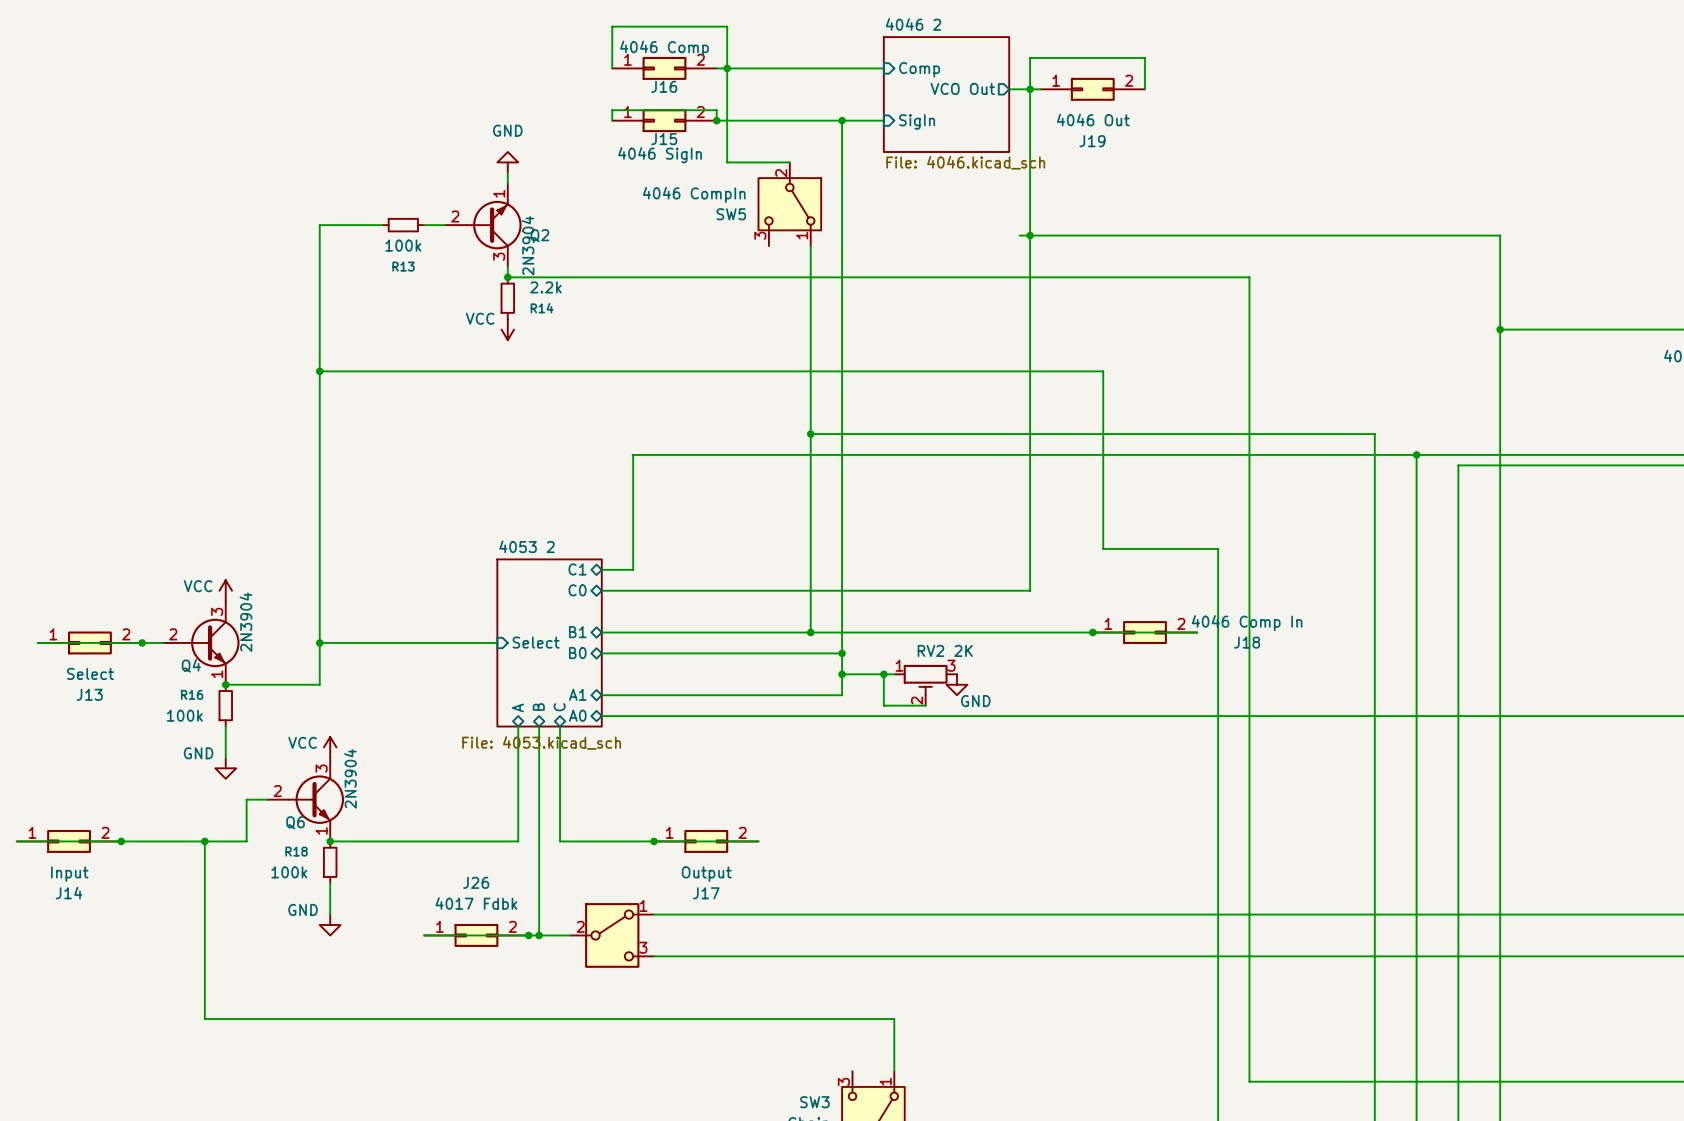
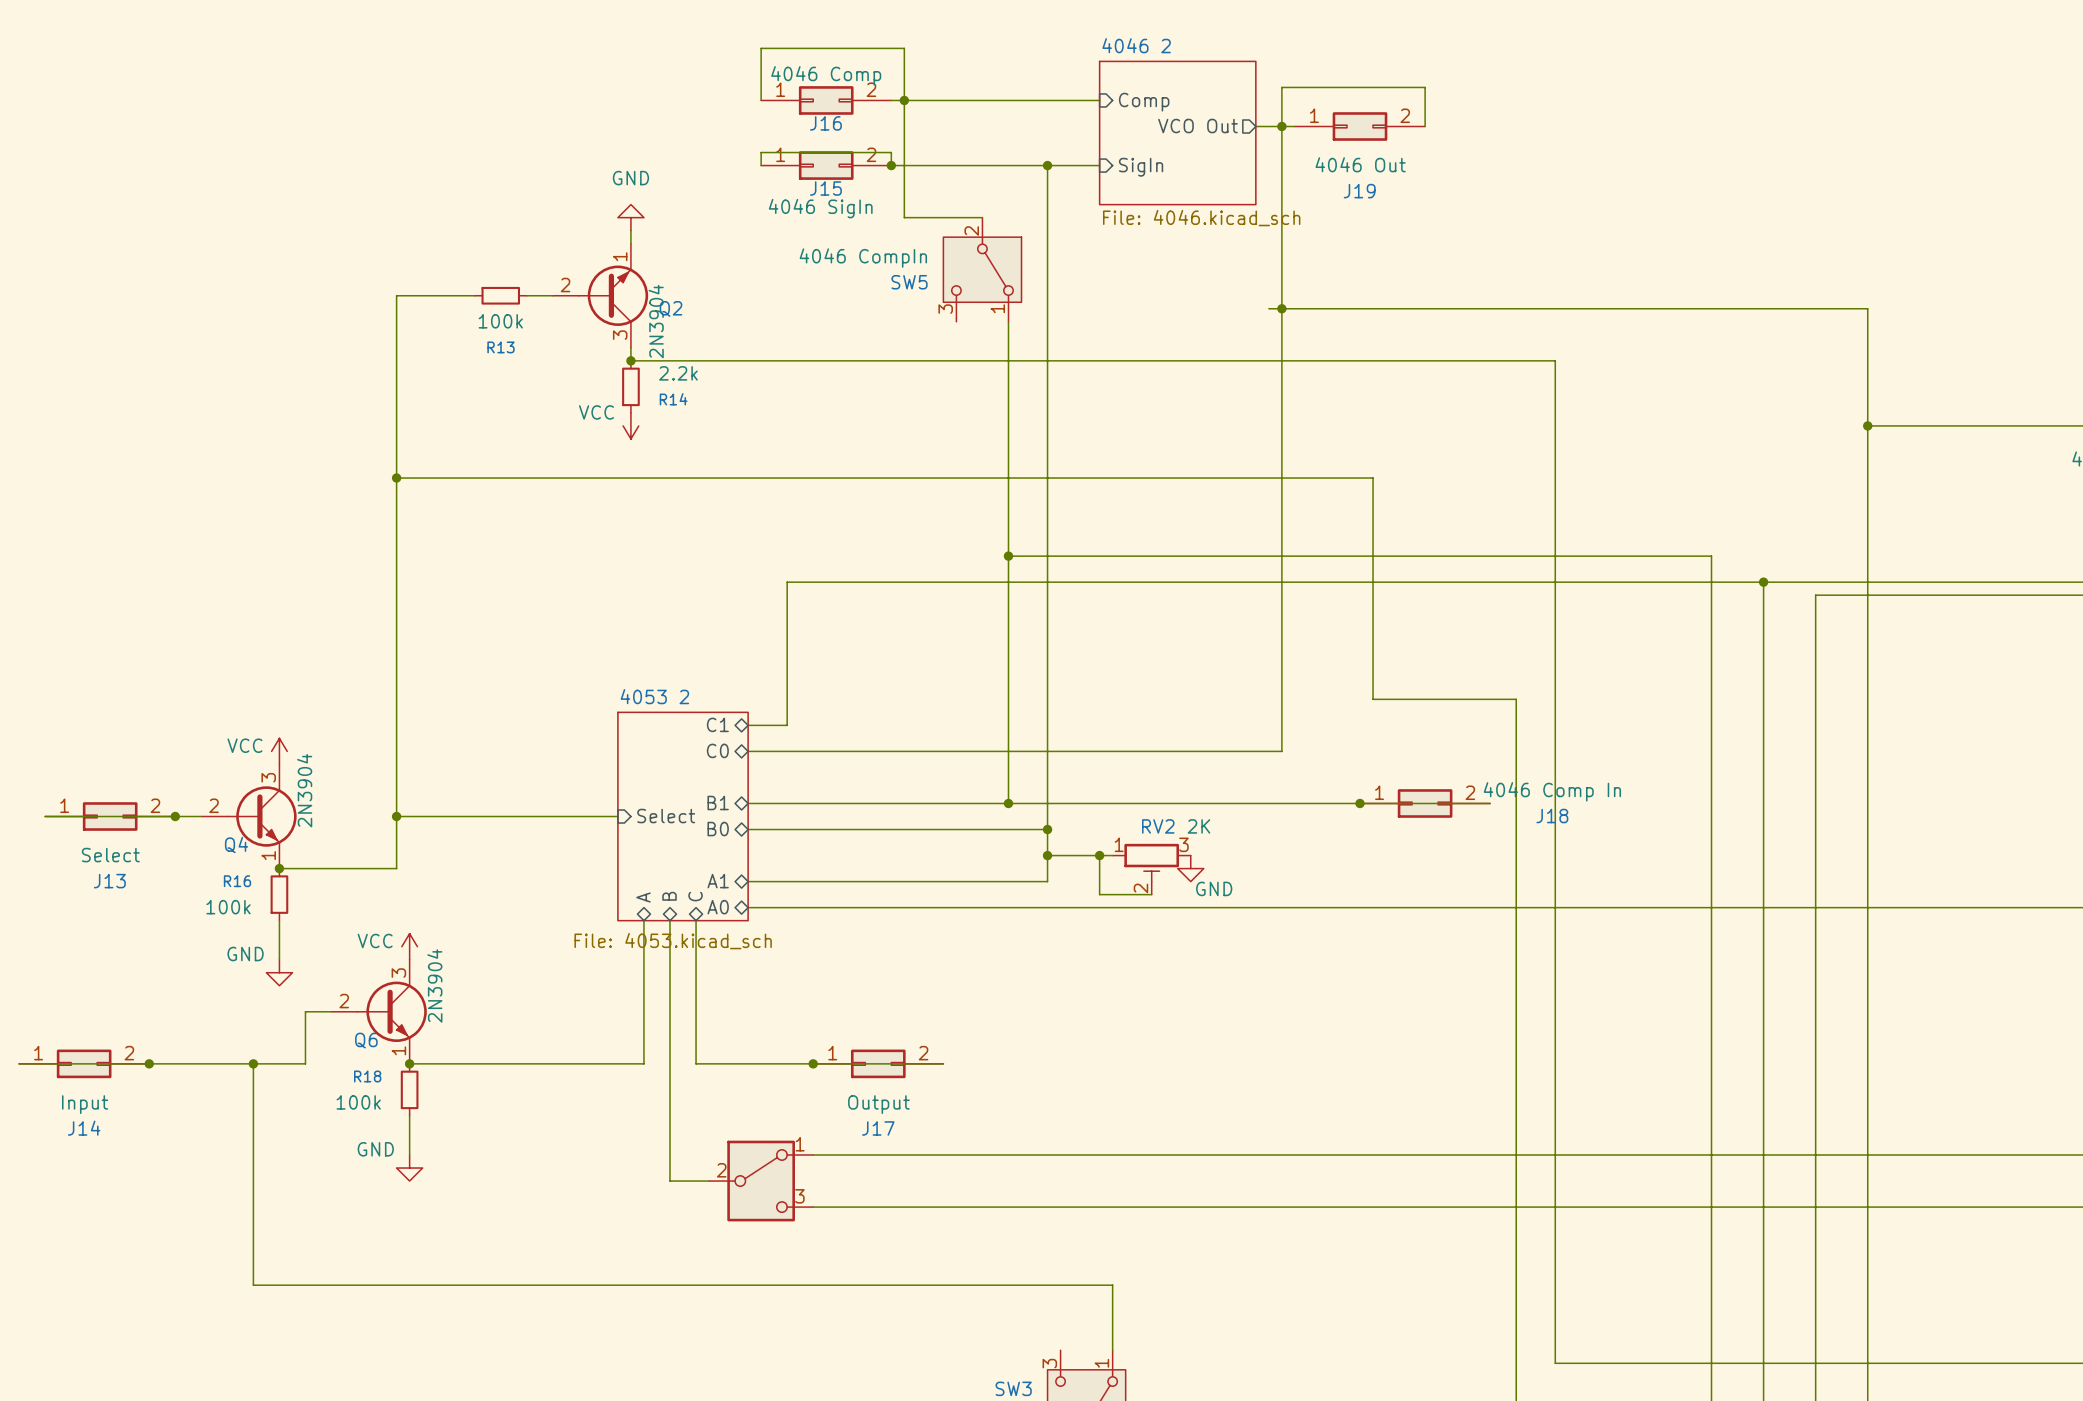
wire: (424, 935) (539, 935) -> none
J26: 4017 Fdbk (476, 935) -> none
junction: (528, 935) -> none
junction: (539, 935) -> none

